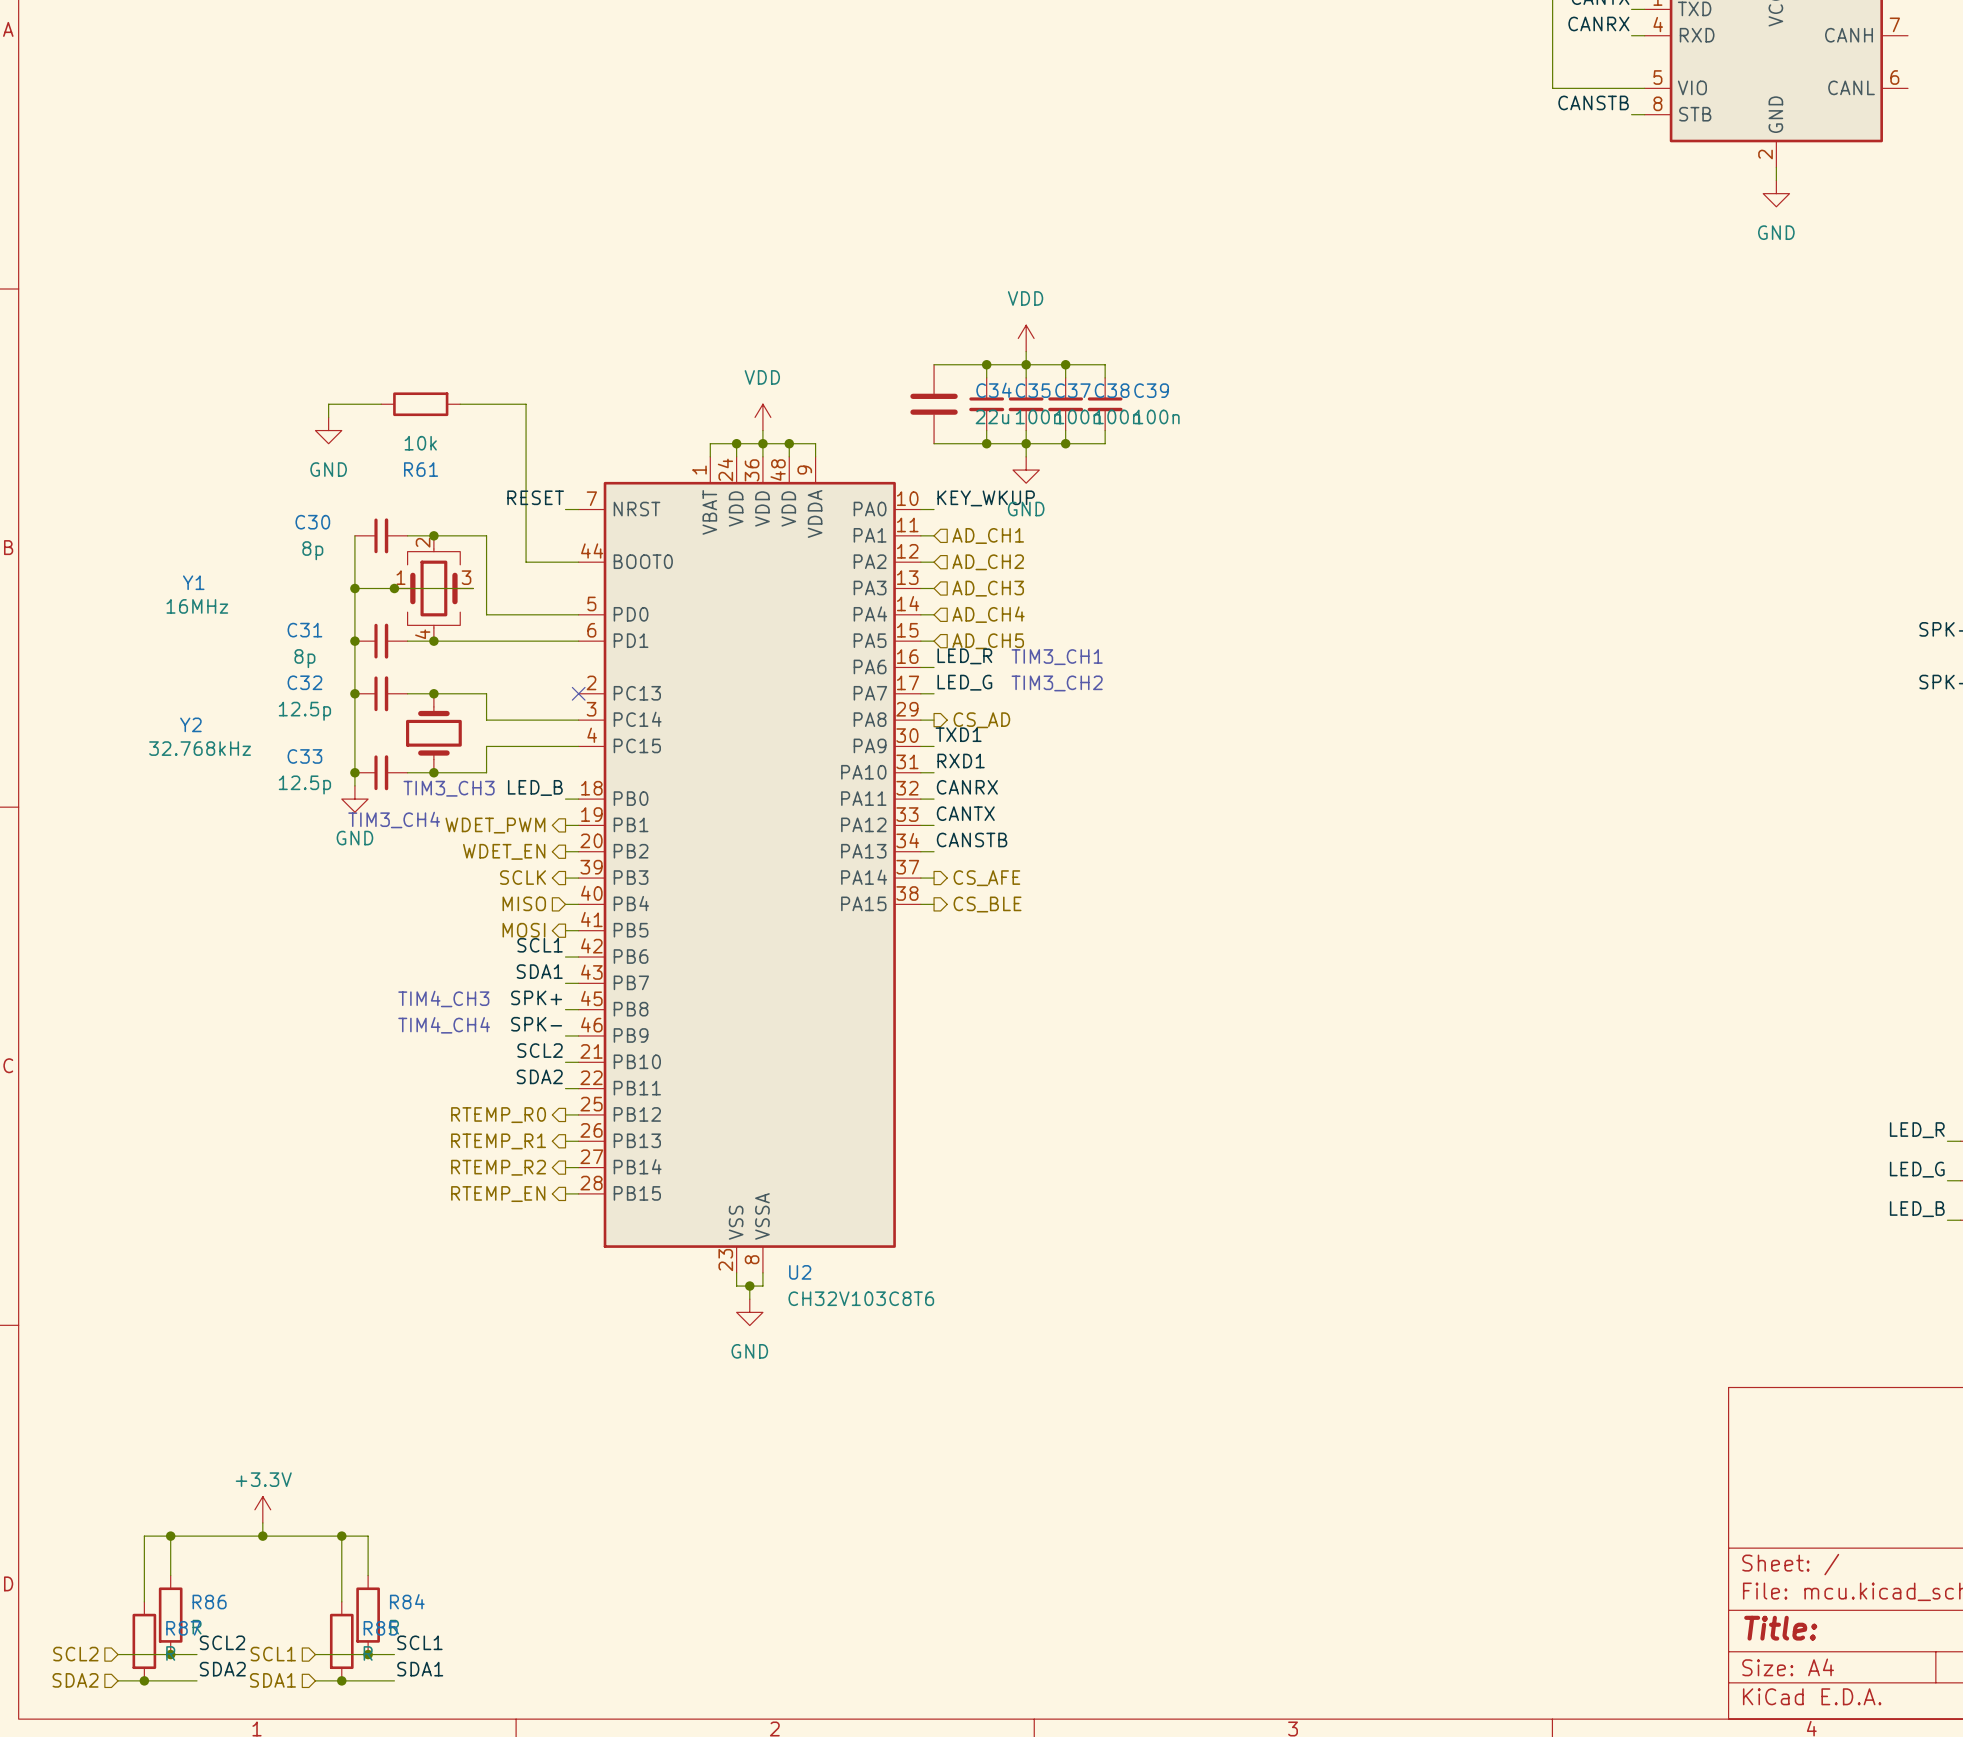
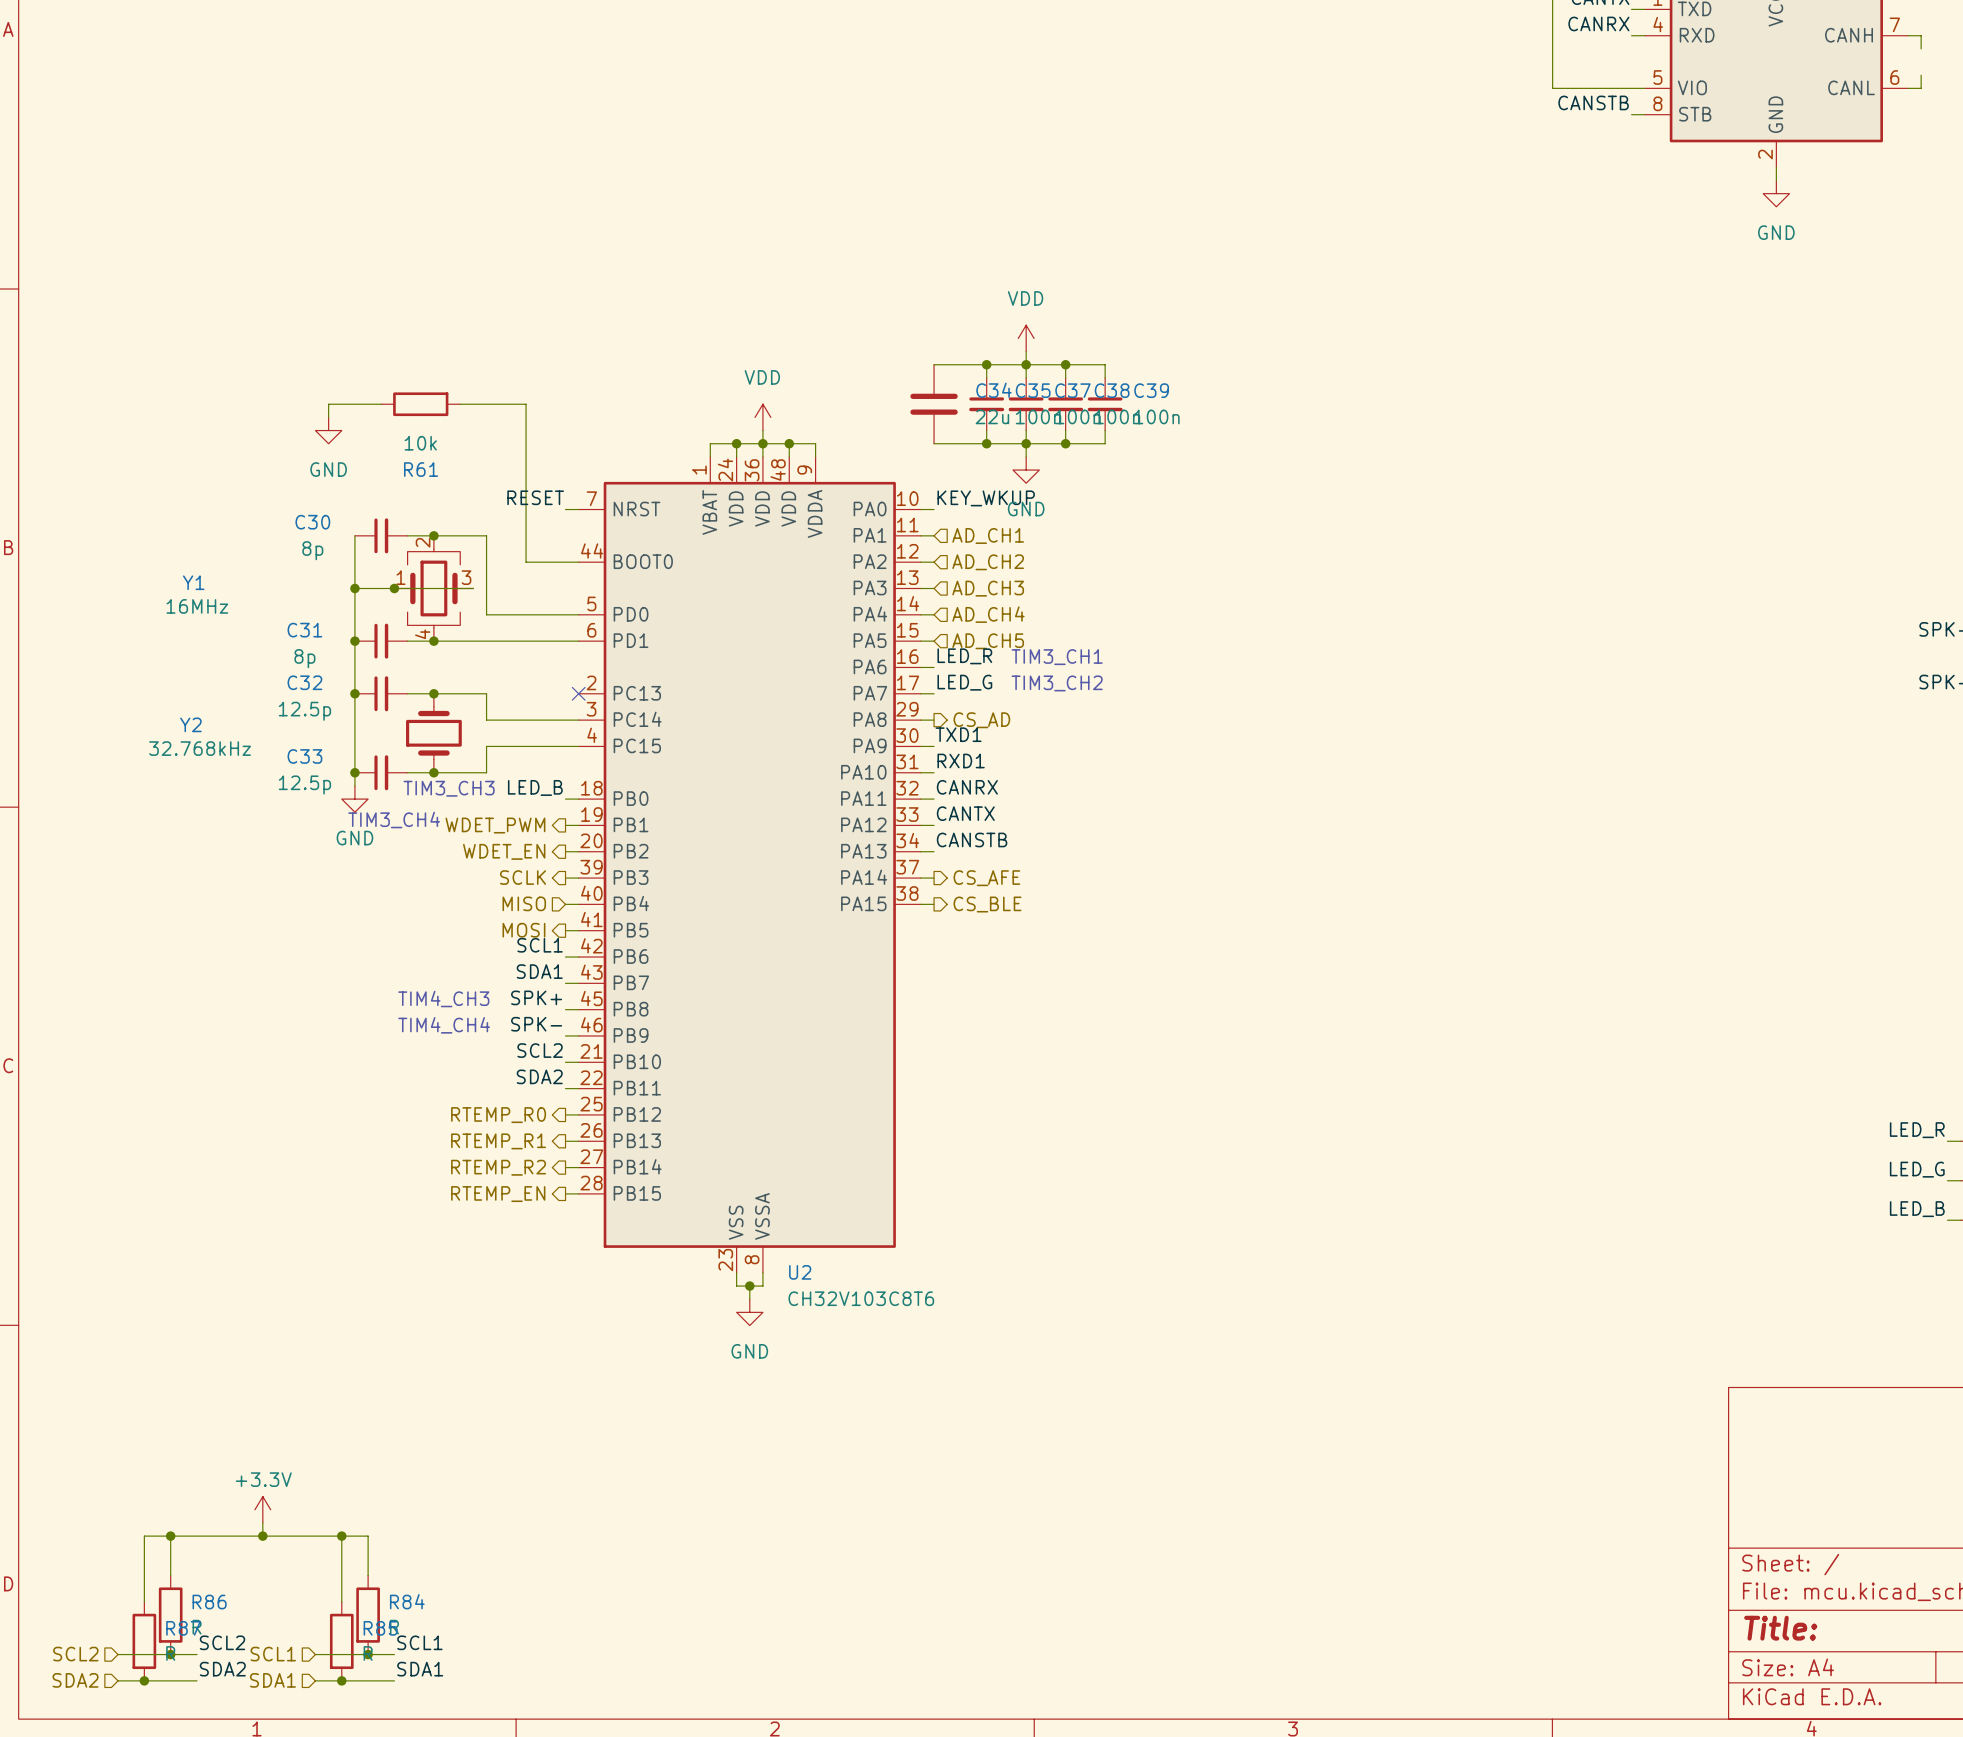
wire: none -> (1907, 35) (1921, 35) (1921, 48)
wire: none -> (1921, 75) (1921, 88) (1907, 88)

